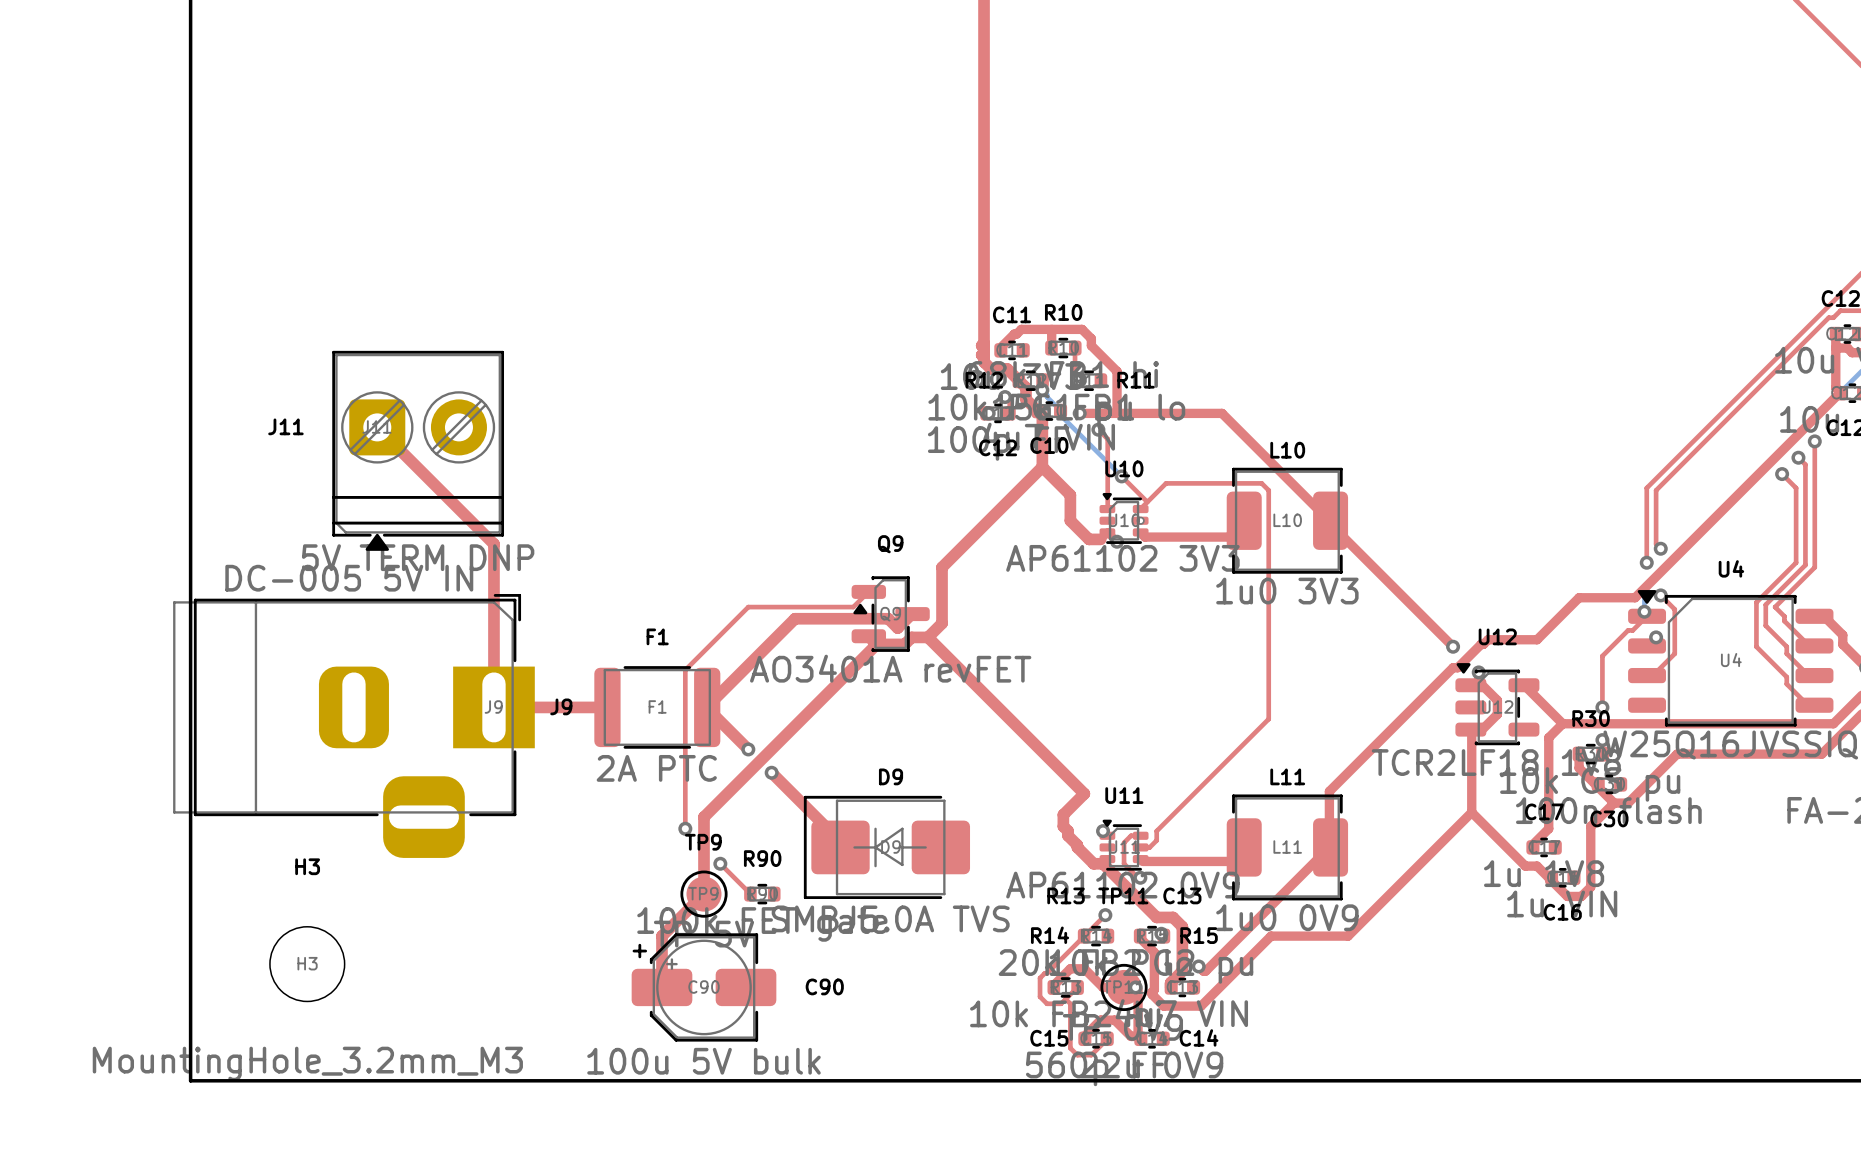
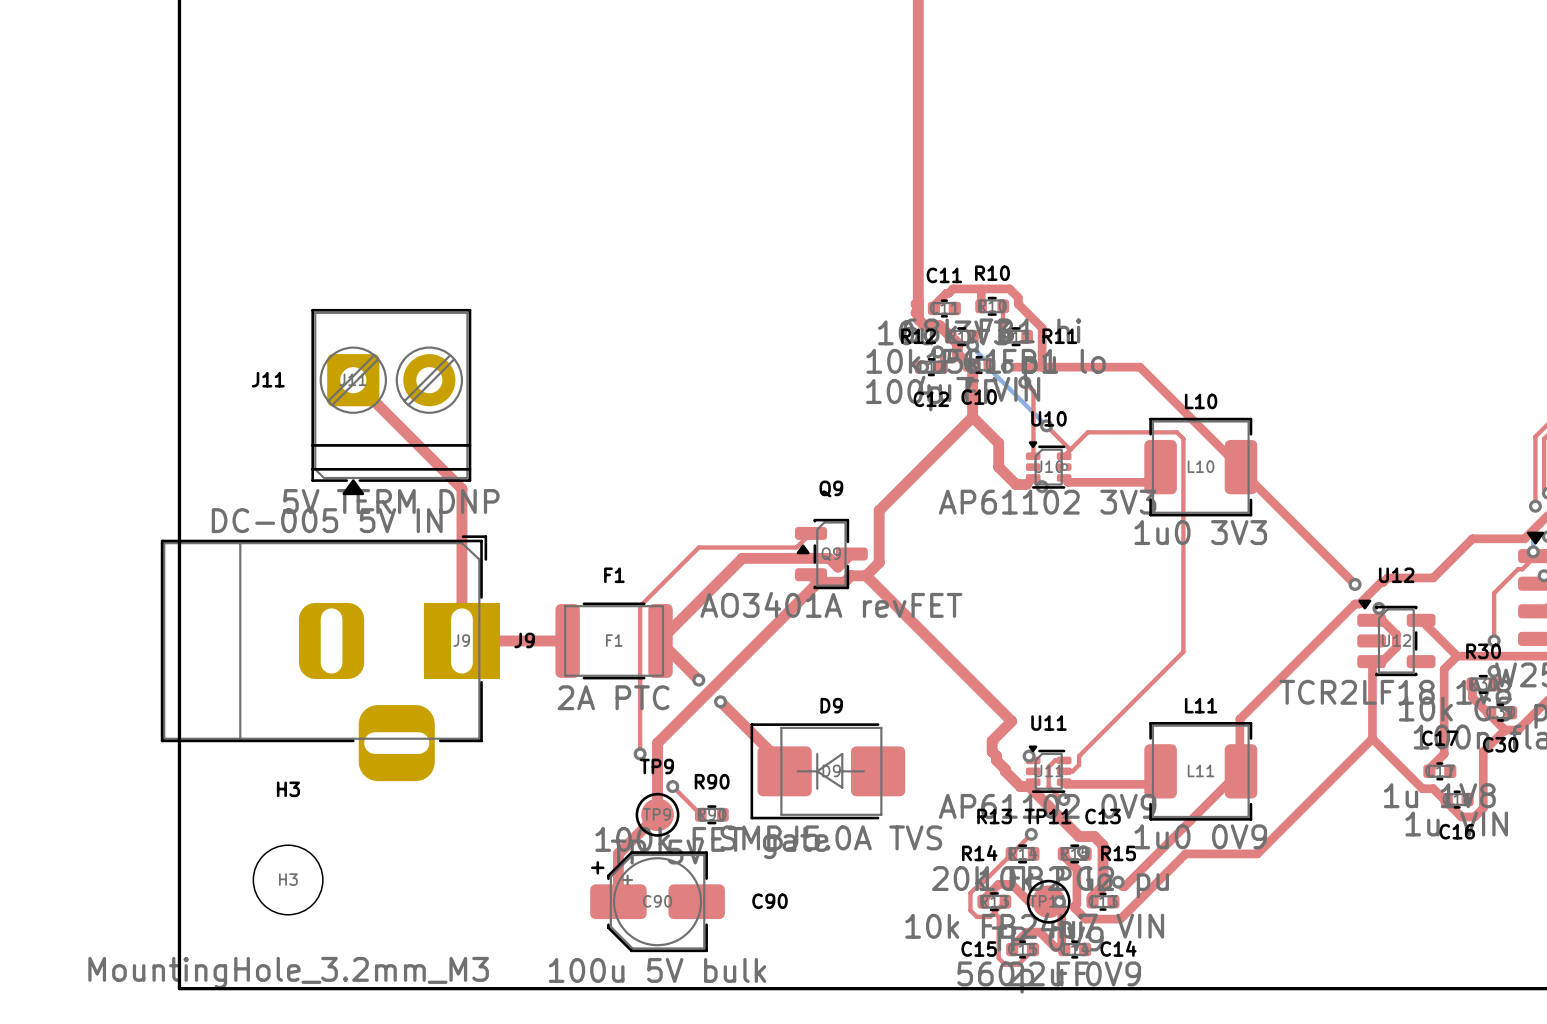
J9 footprint: [173, 594, 535, 858] -> [160, 535, 500, 782]

